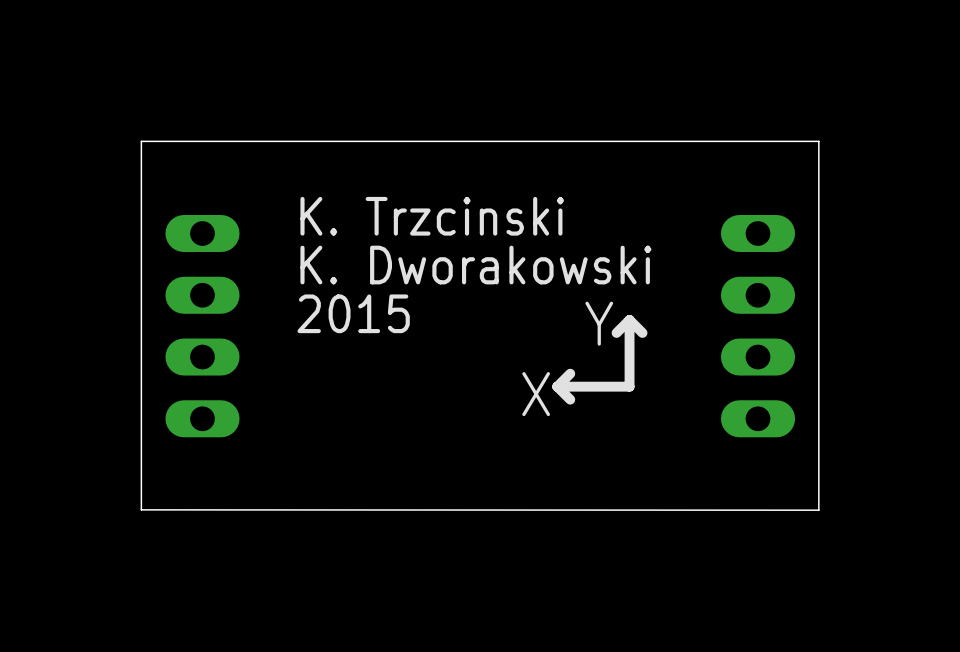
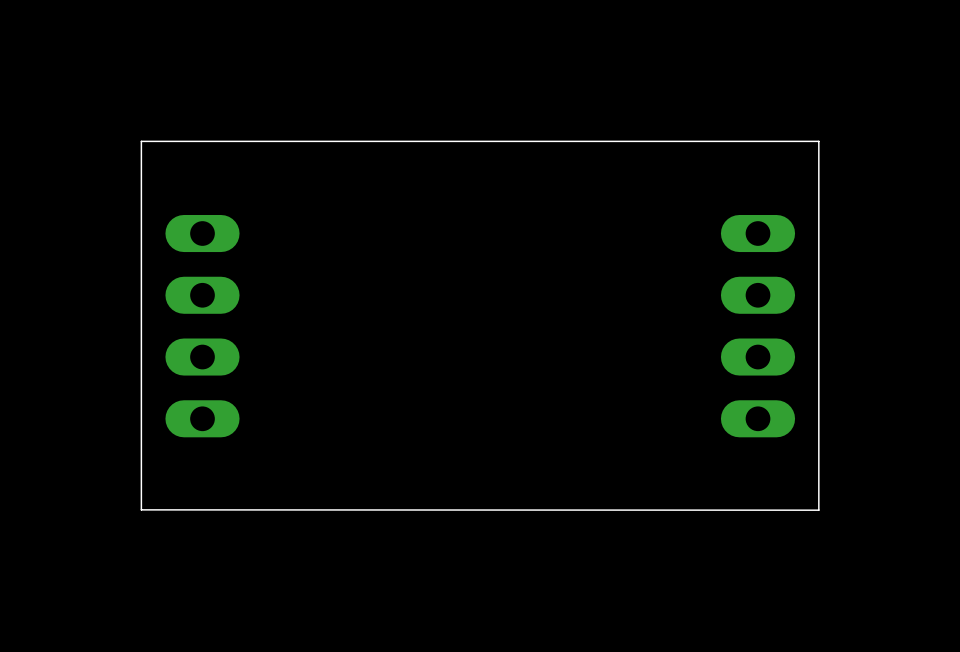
text: K. Trzcinski (432, 216) -> none
text: K. Dworakowski (475, 265) -> none
text: 2015 (353, 313) -> none
line: (629, 319) (629, 386) (557, 386) -> none
line: (629, 319) (642, 332) -> none
line: (629, 319) (616, 332) -> none
text: Y (599, 323) -> none
line: (570, 373) (557, 386) -> none
line: (557, 386) (570, 399) -> none
text: X (536, 394) -> none

